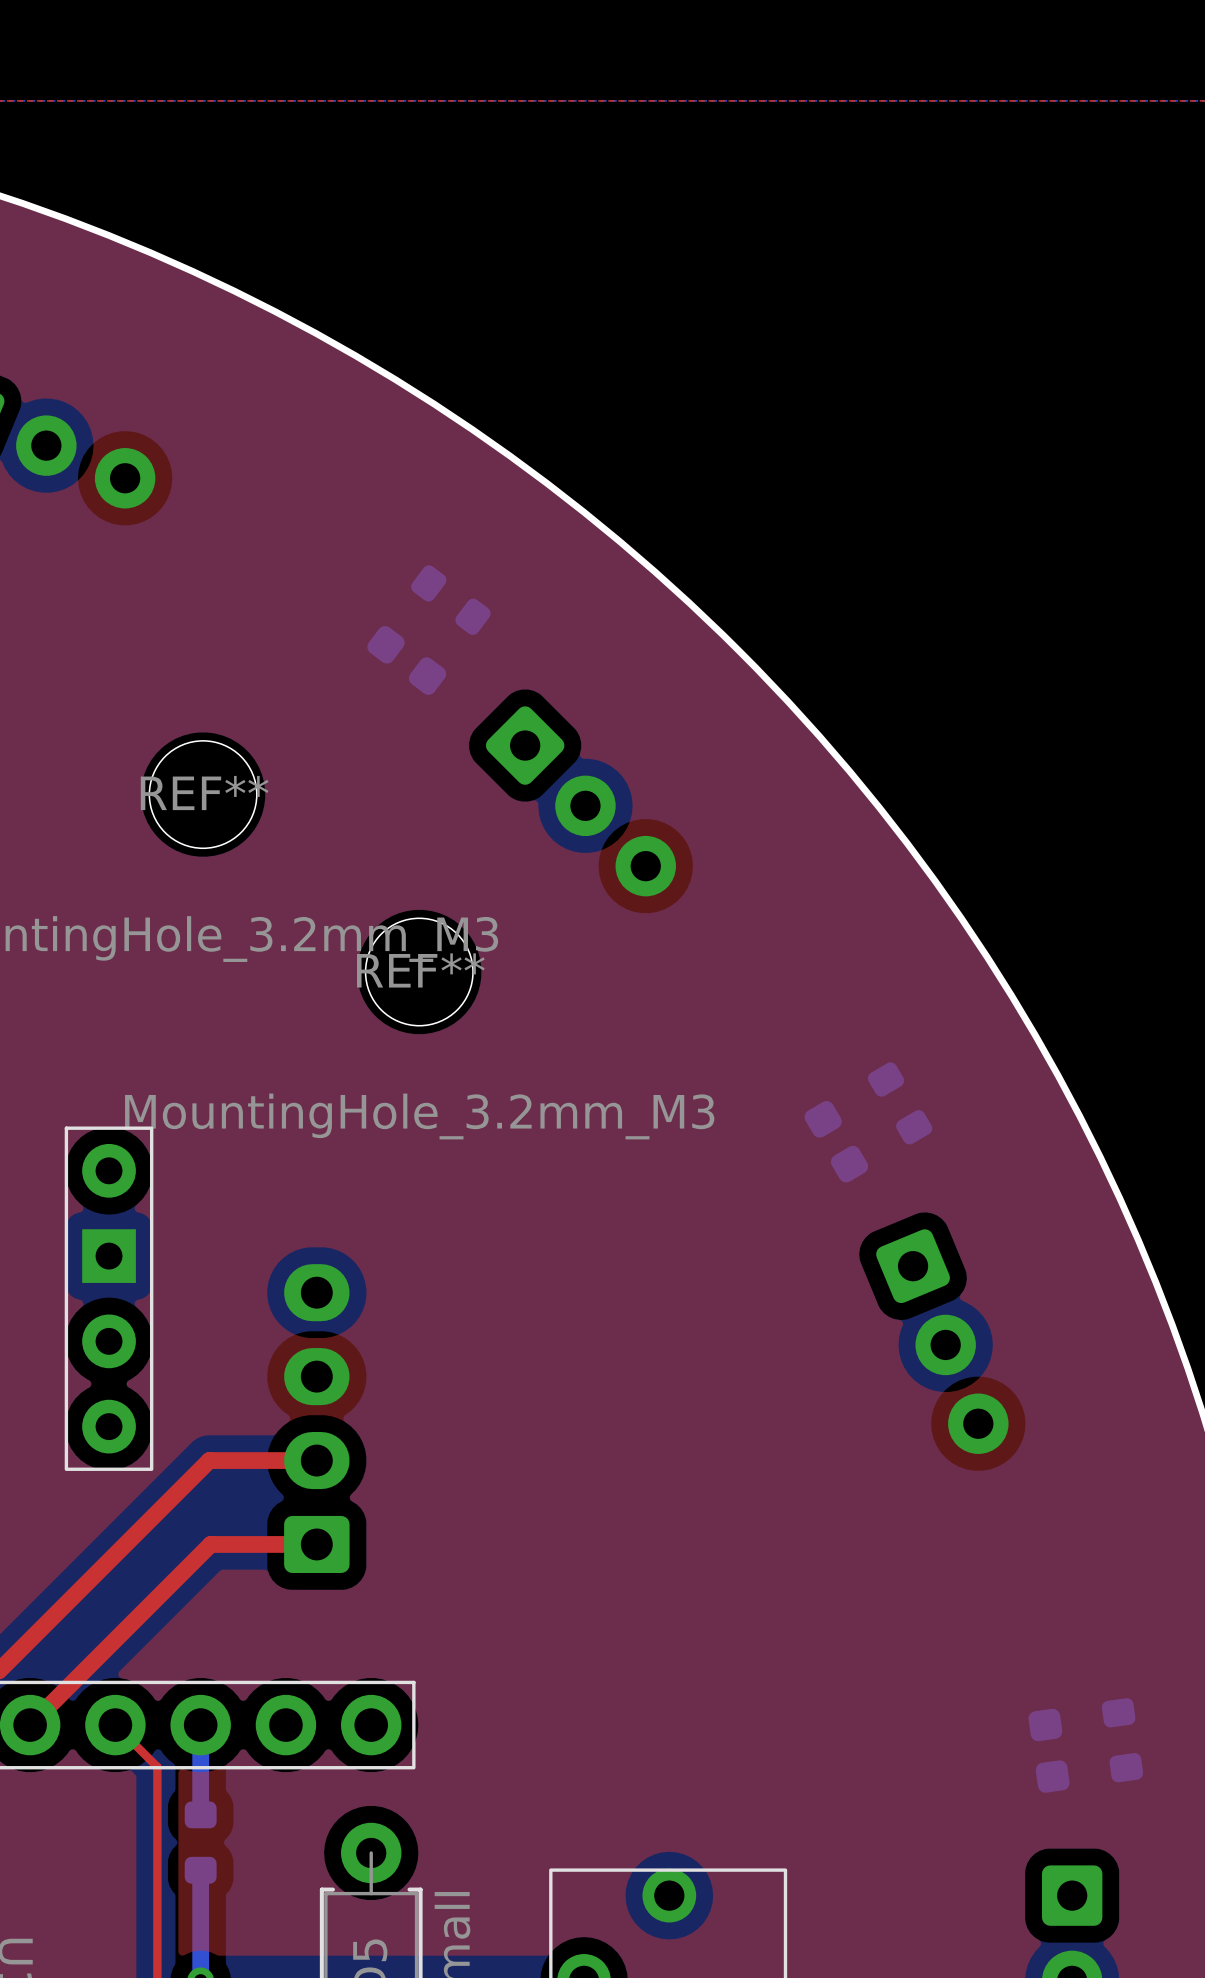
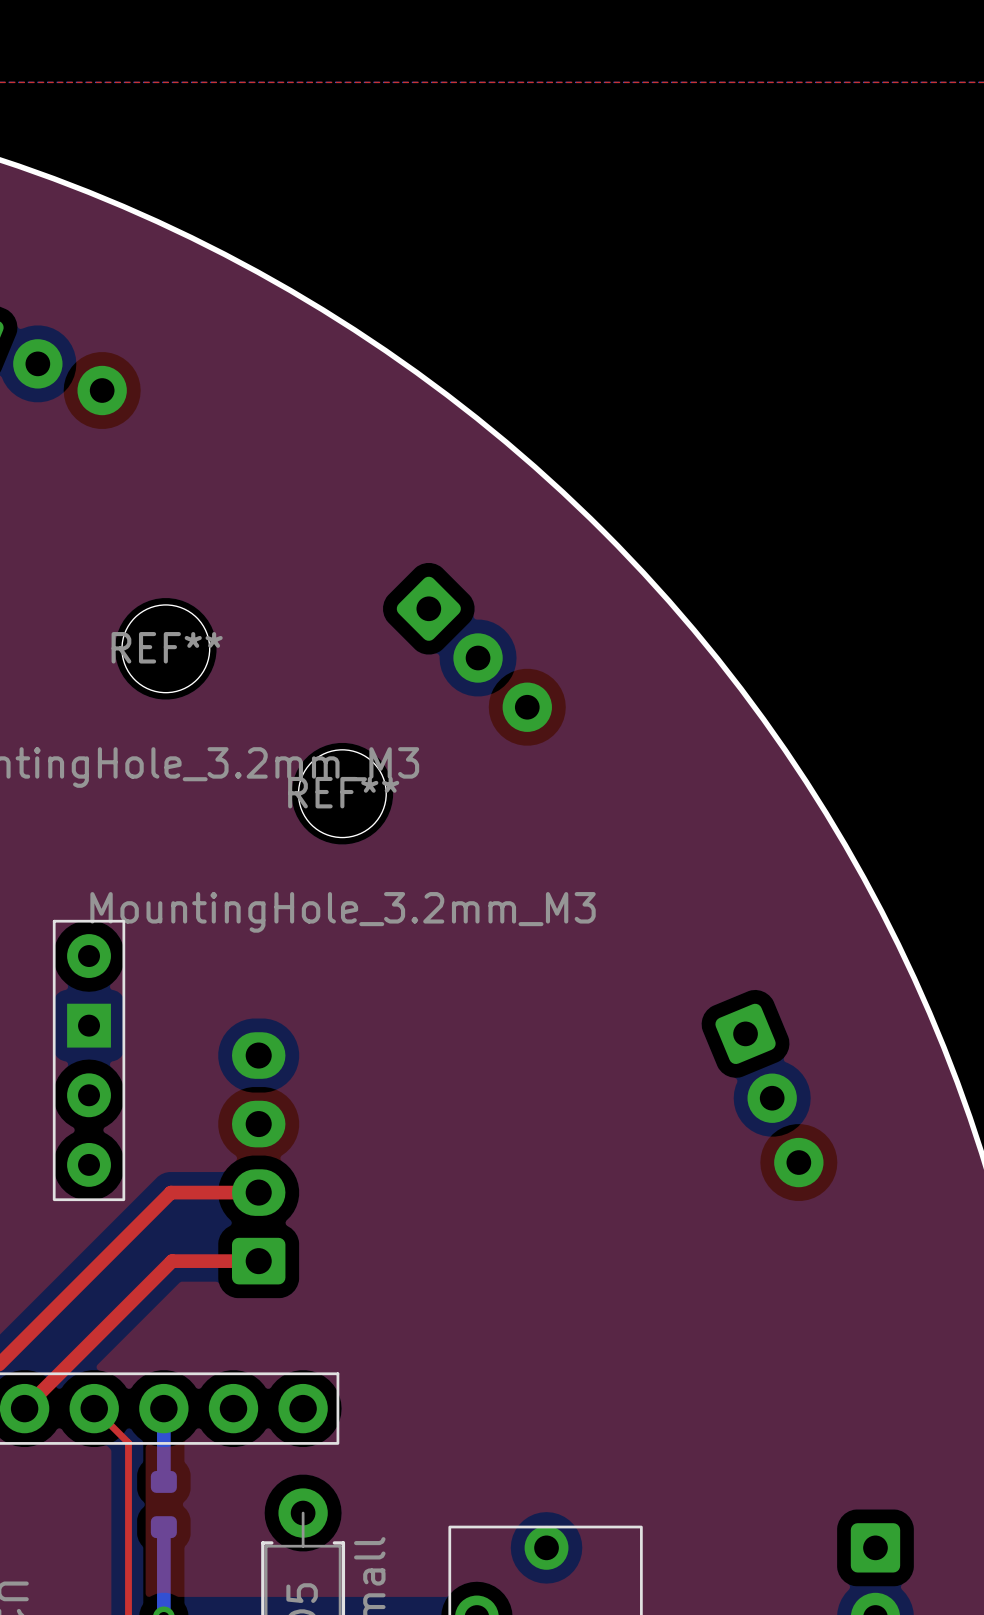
part: (450, 600) -> none
part: (406, 660) -> none
part: (900, 1103) -> none
part: (836, 1141) -> none
part: (1122, 1740) -> none
part: (1049, 1750) -> none

